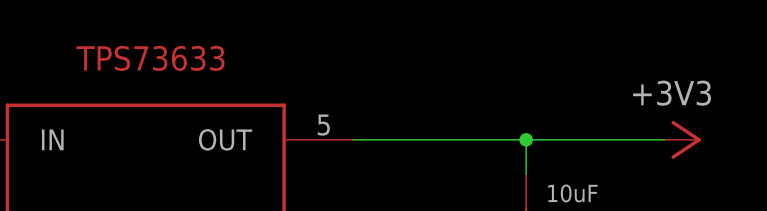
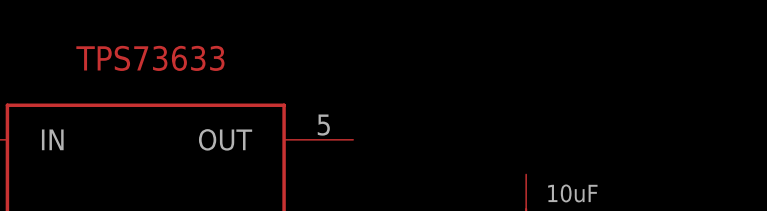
wire: (353, 139) (664, 139) -> none
wire: (526, 139) (526, 174) -> none
junction: (526, 139) -> none
power symbol: +3V3 (682, 139) -> none

